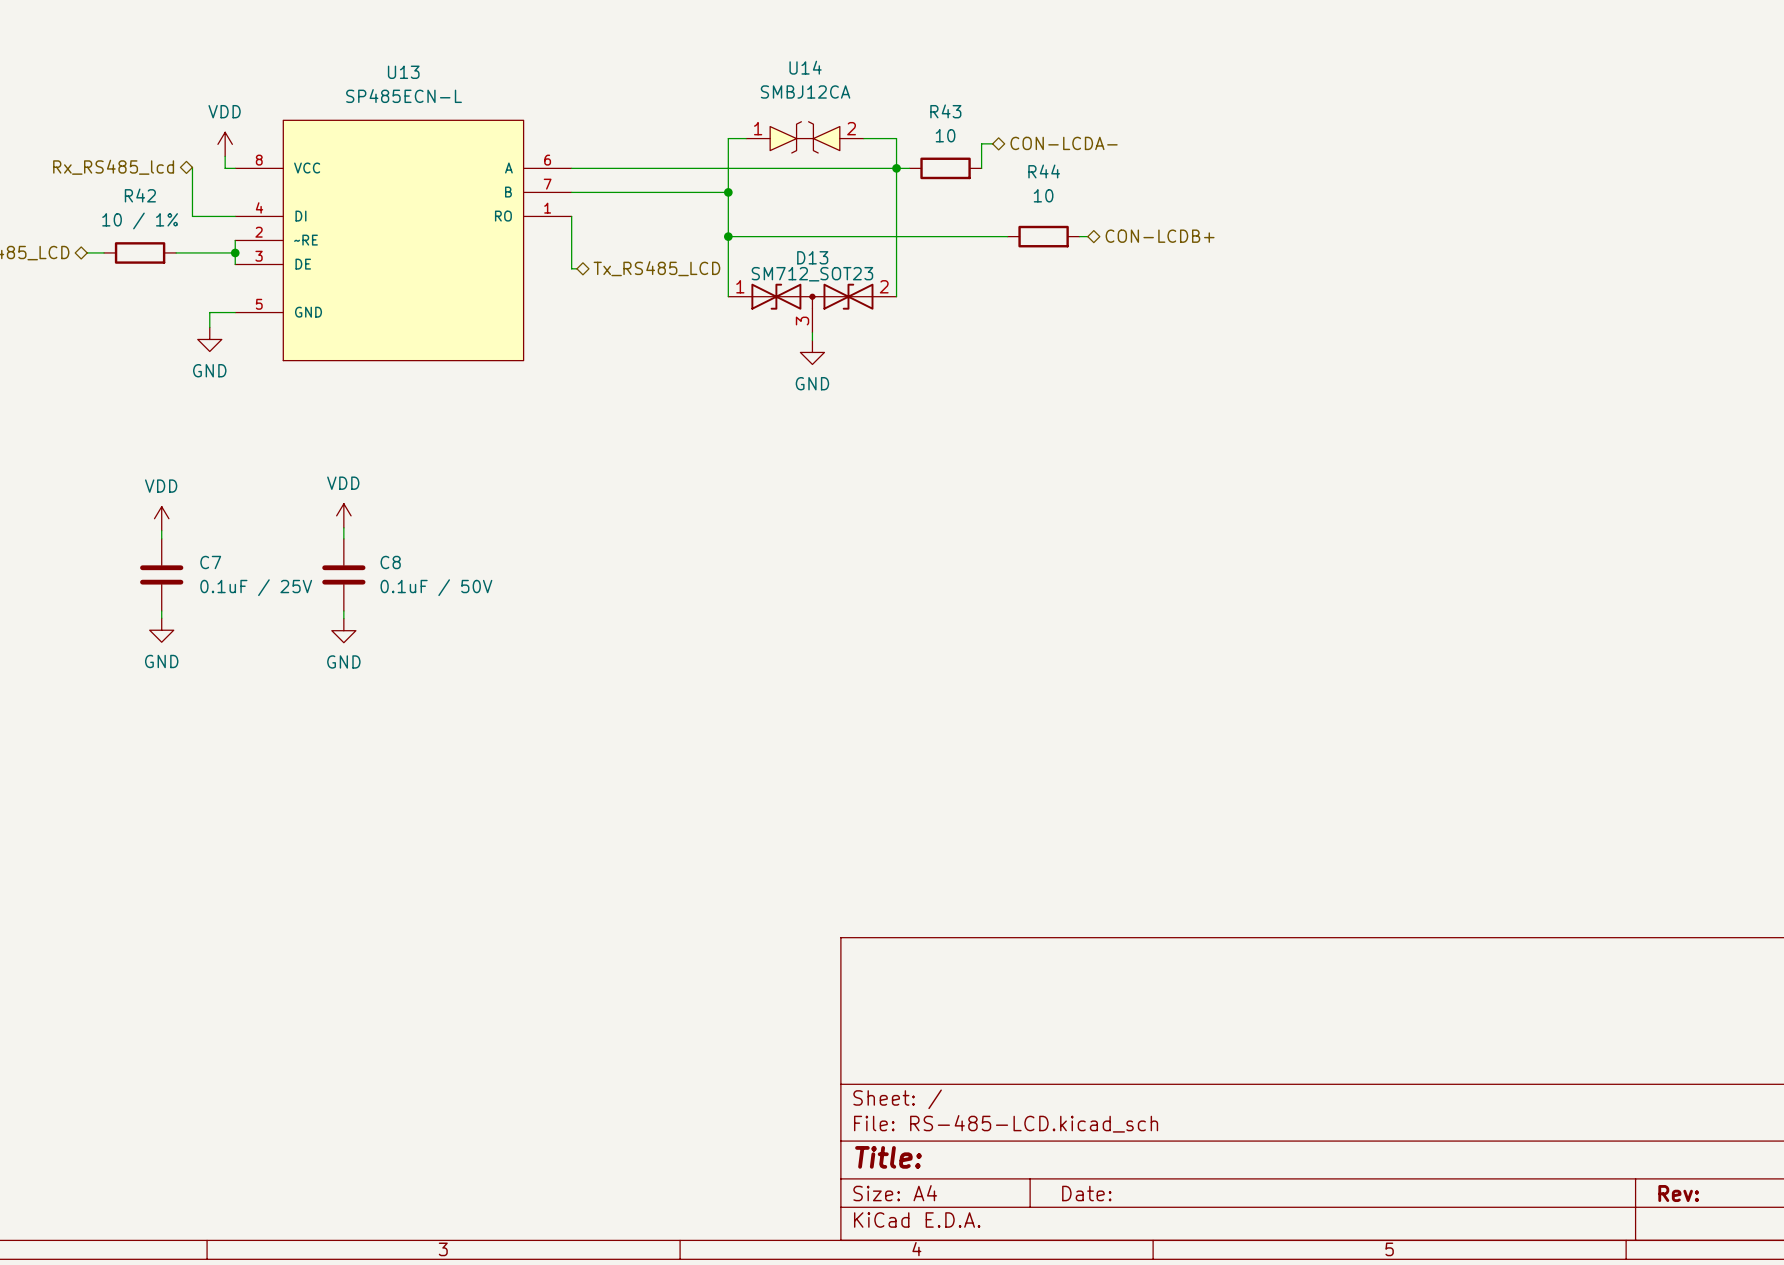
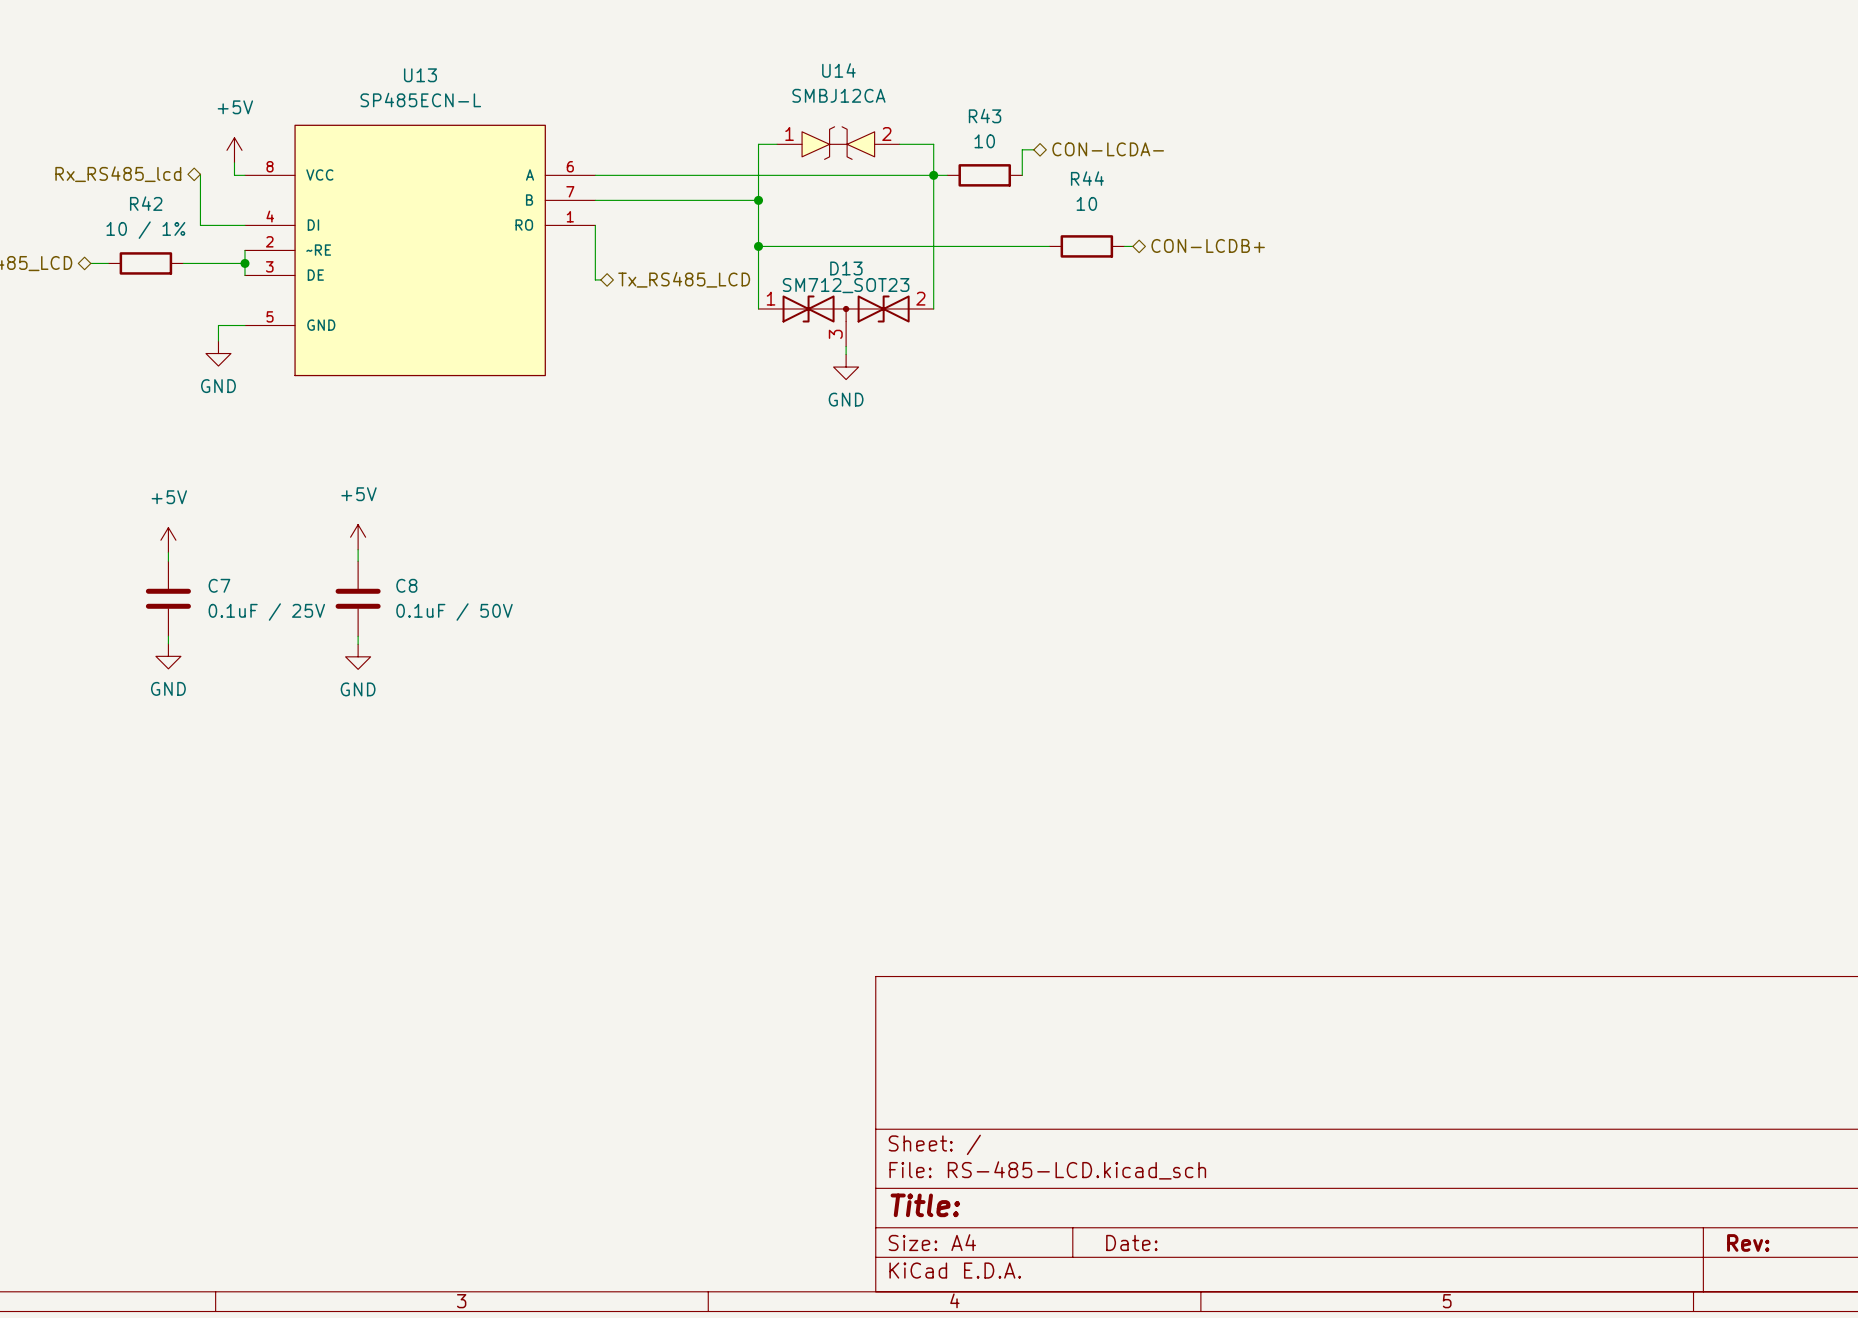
power symbol: VDD (225, 144) -> +5V (234, 150)
power symbol: VDD (343, 515) -> +5V (358, 537)
power symbol: VDD (161, 518) -> +5V (168, 540)

